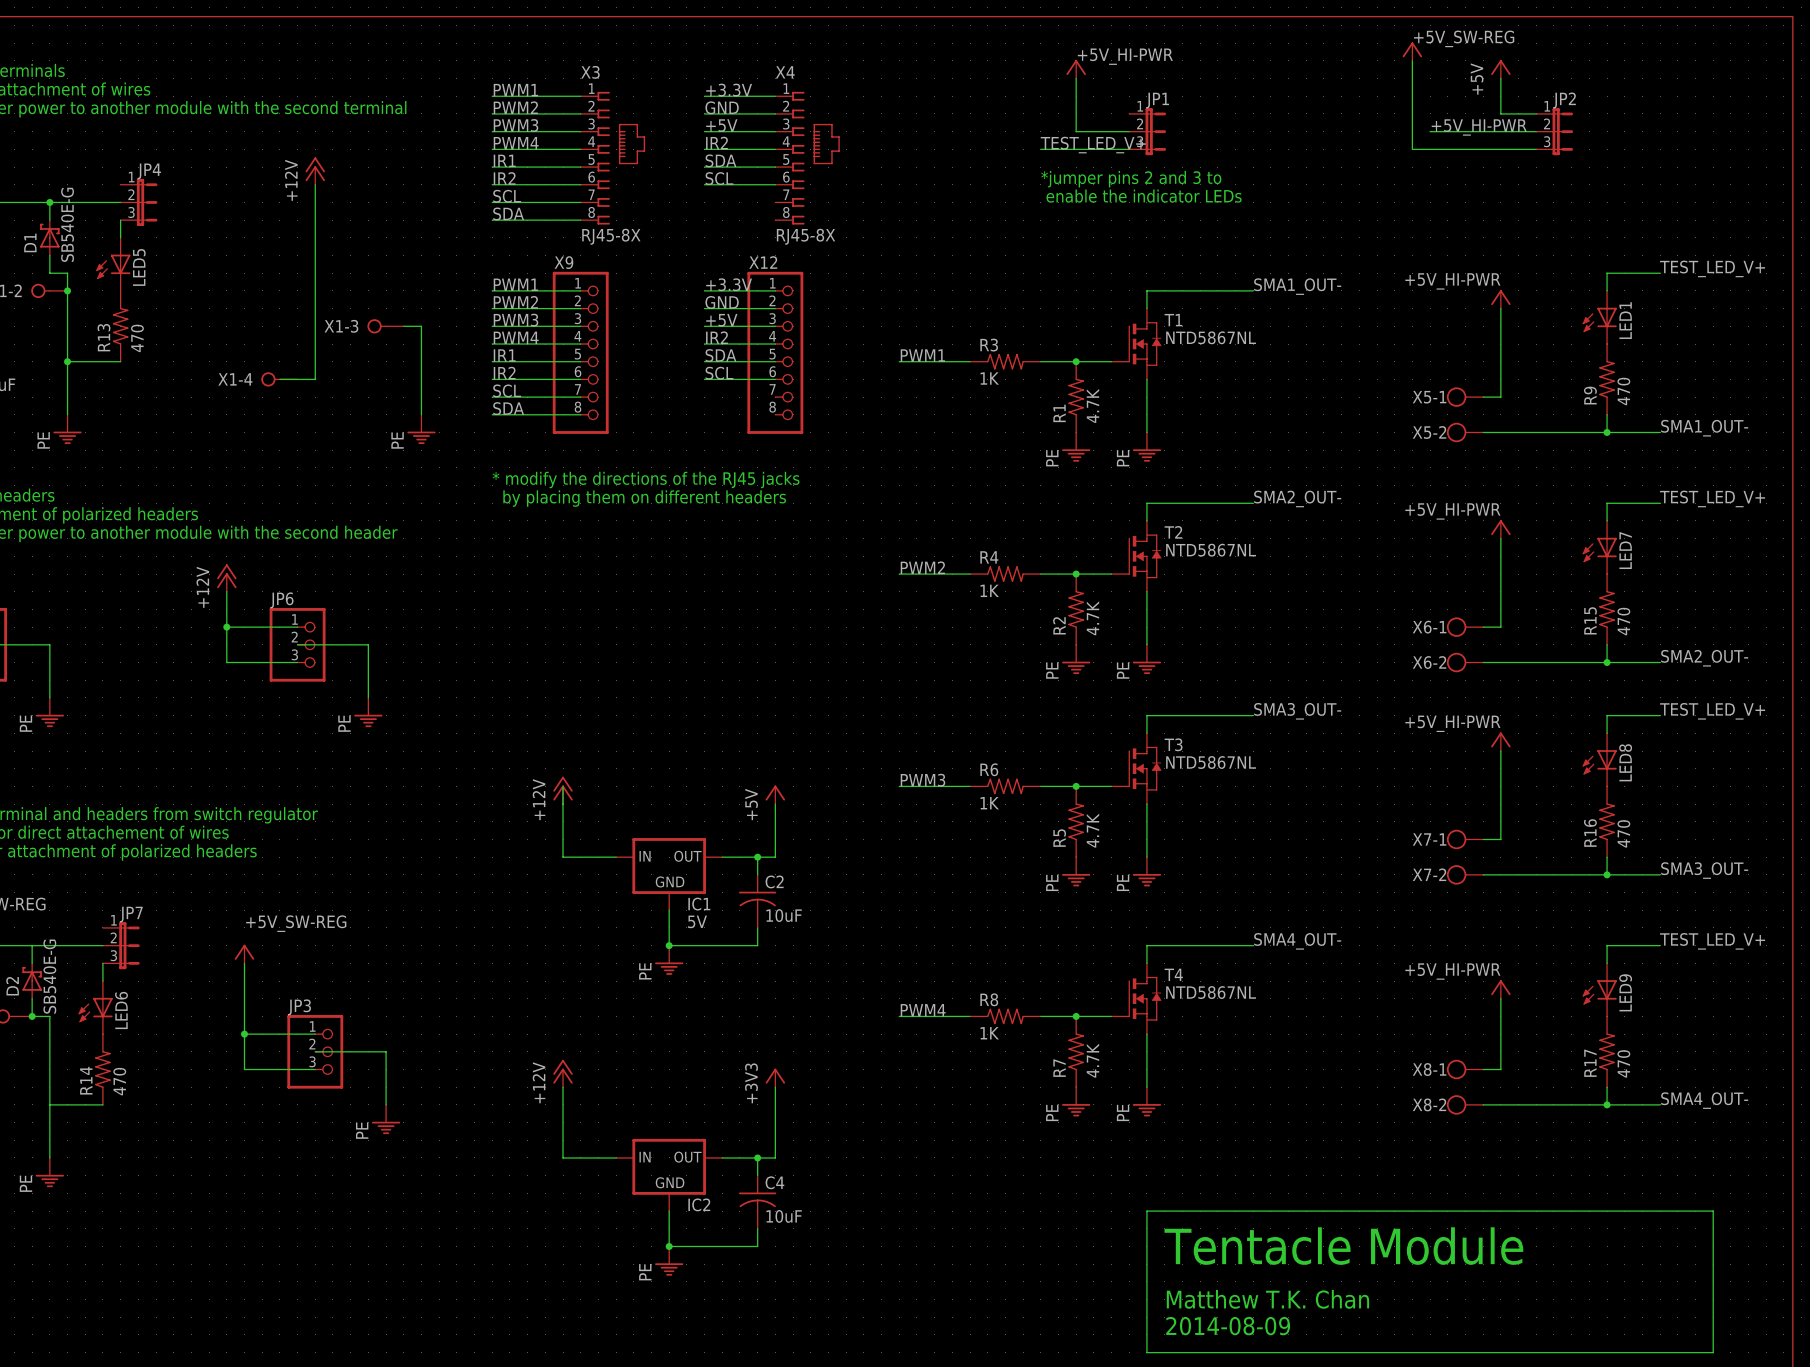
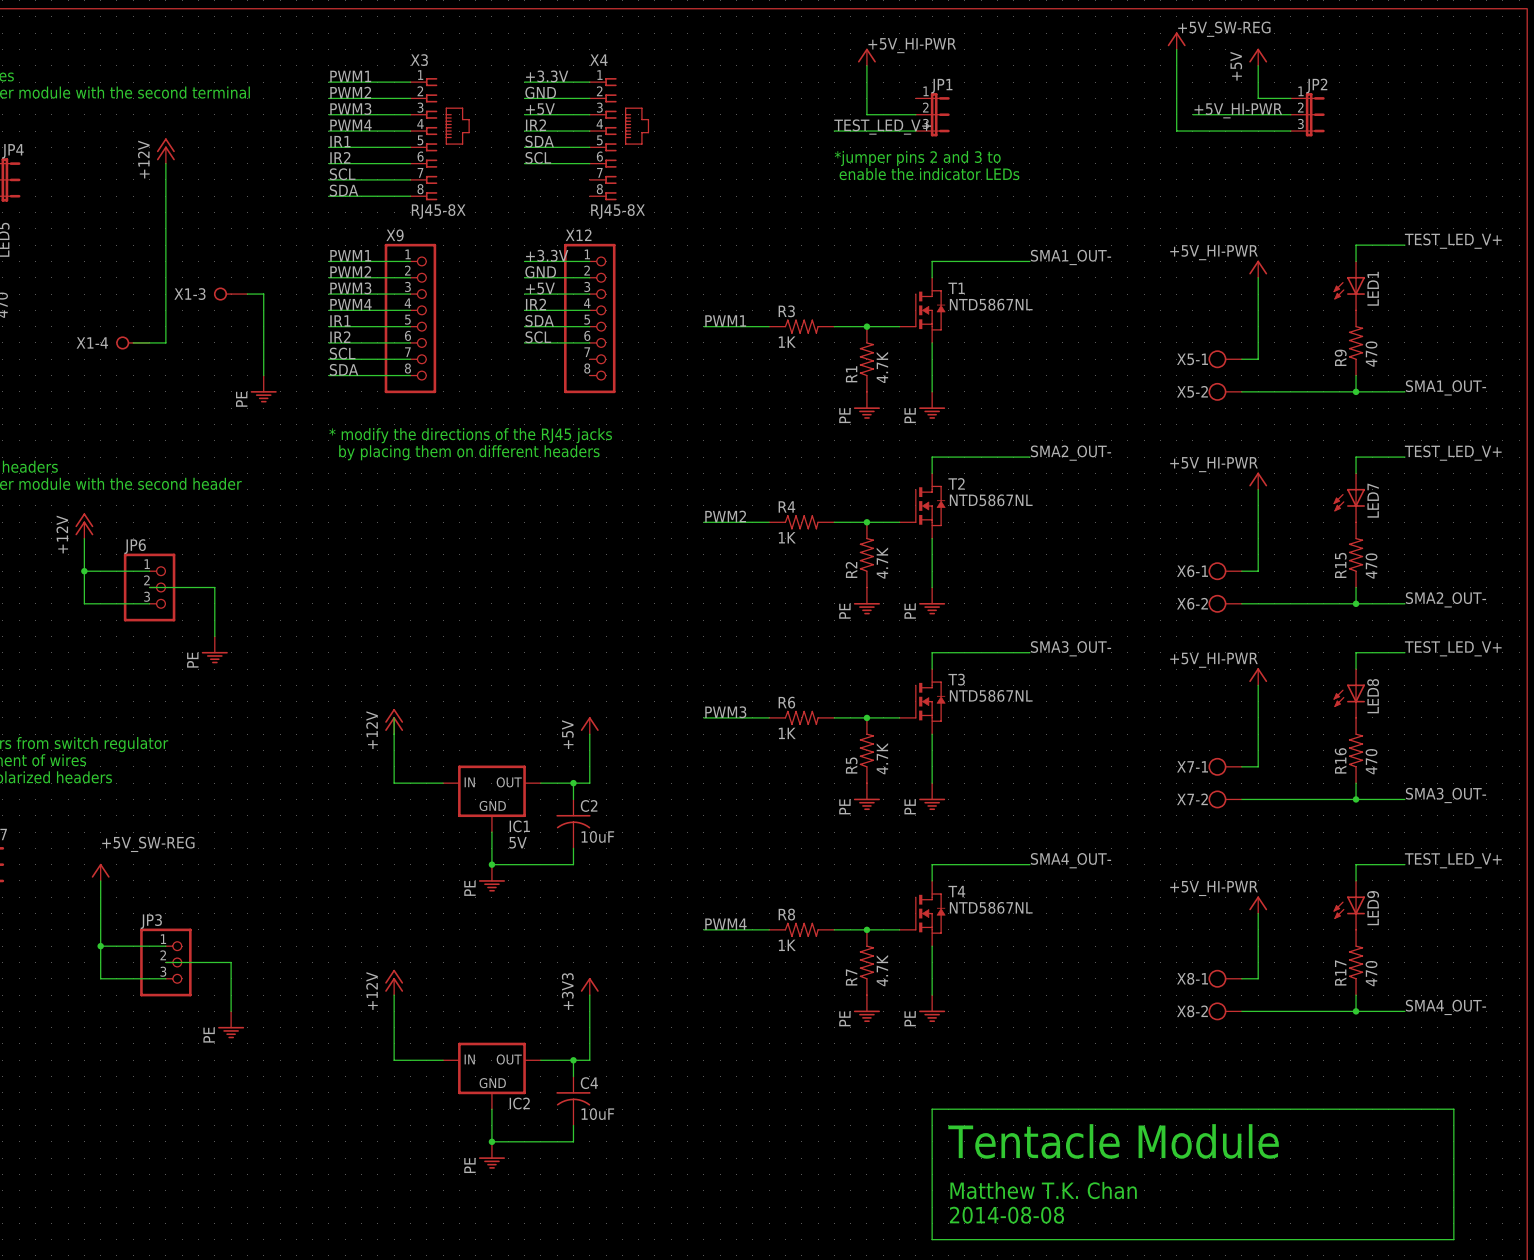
text: 2014-08-09 (1228, 1326) -> 2014-08-08 (1006, 1215)

